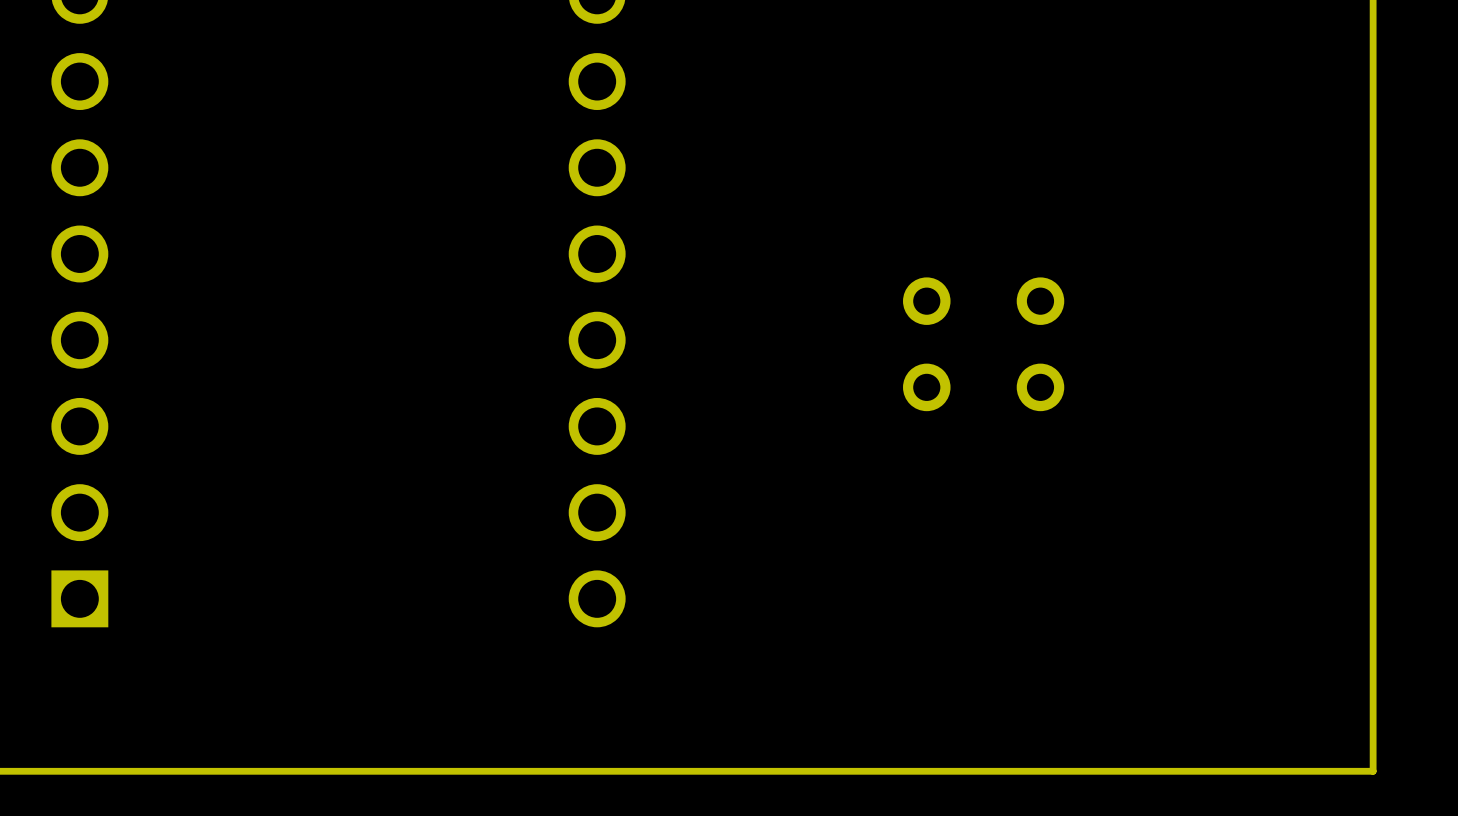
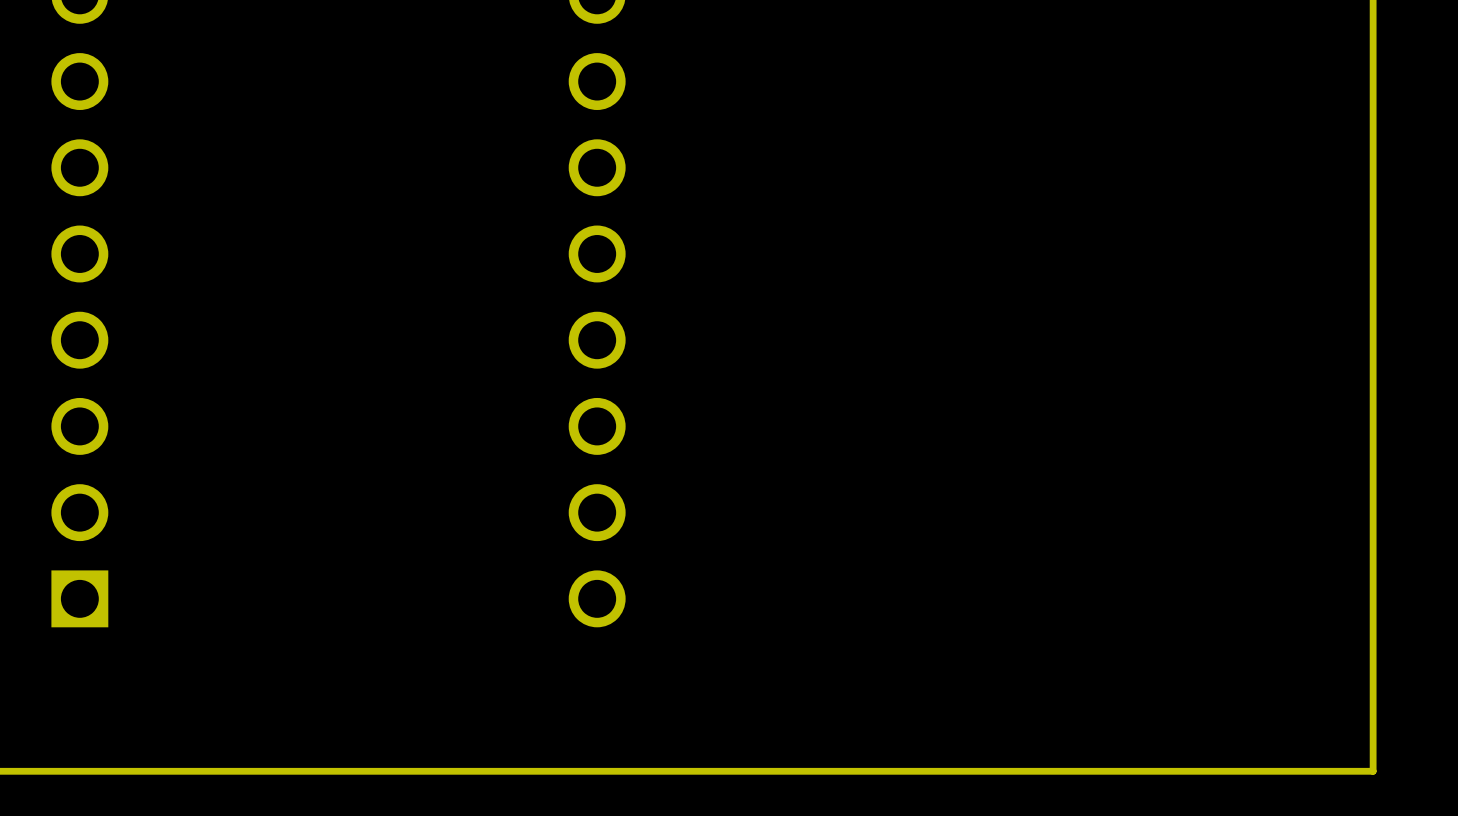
part: (926, 344) -> none
part: (1040, 344) -> none

